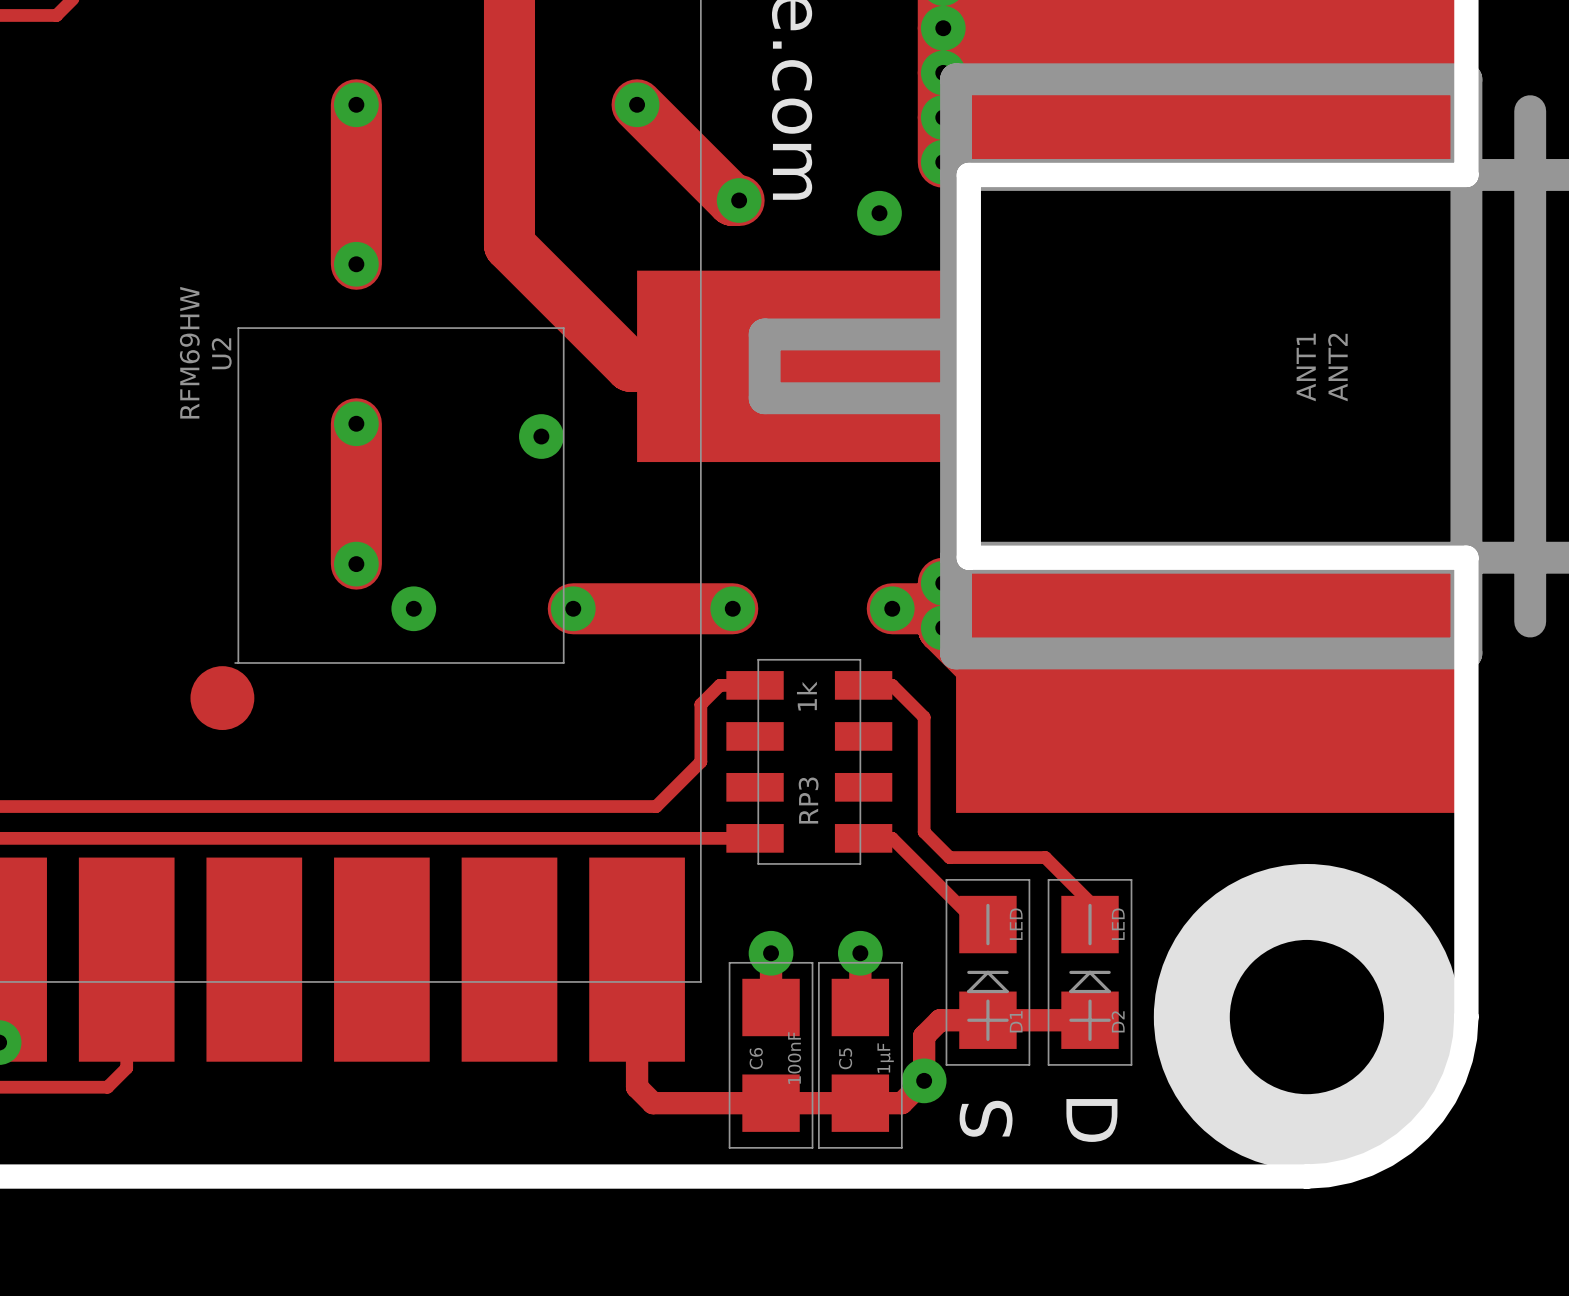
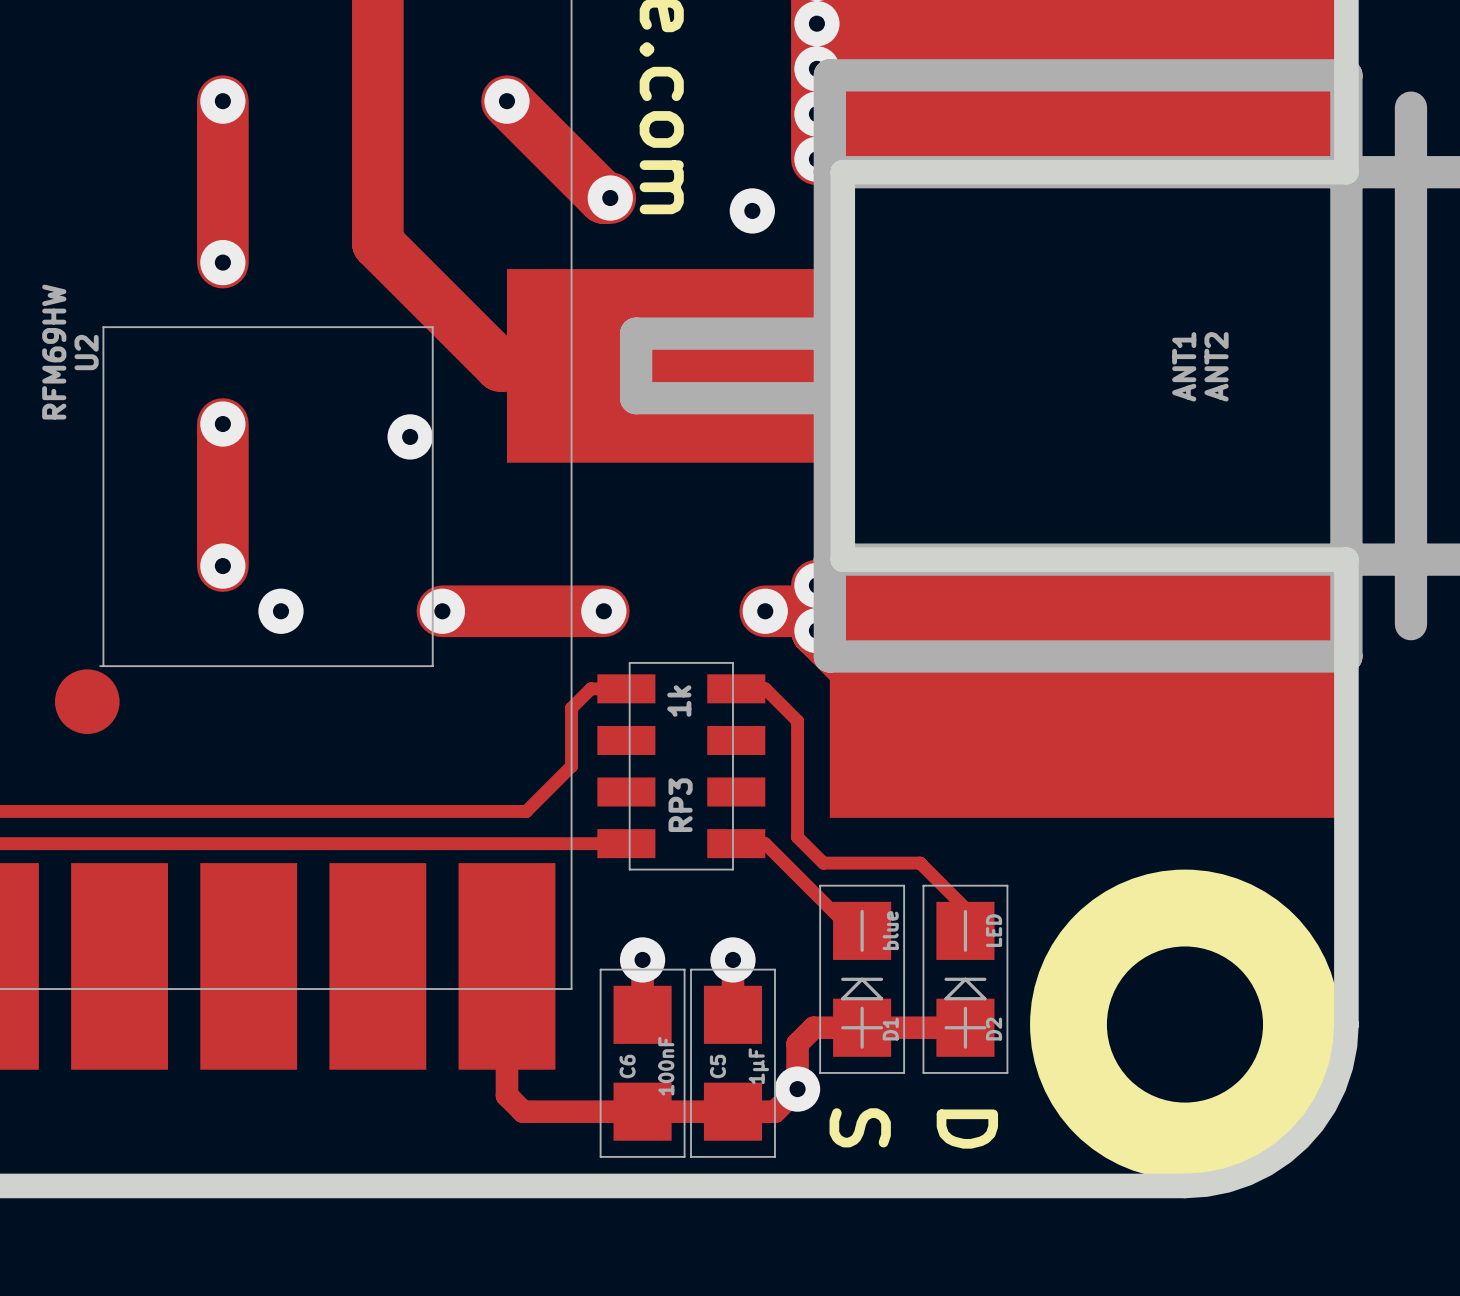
D1 value: LED (1016, 924) -> blue (890, 930)

